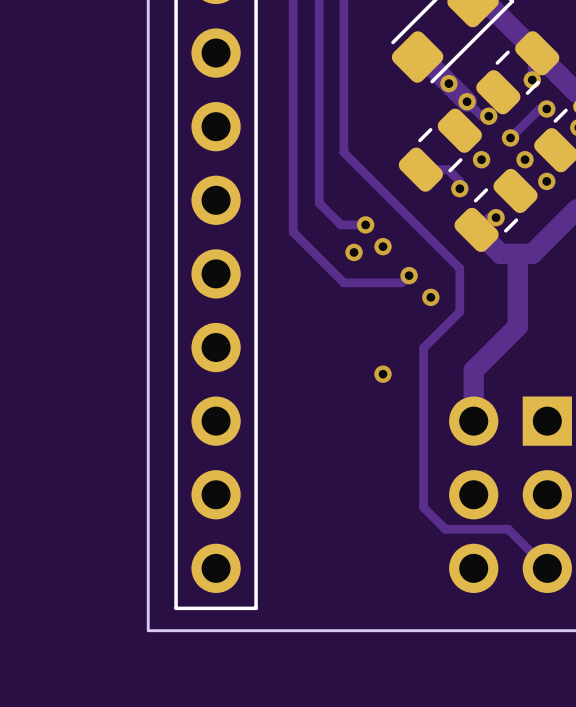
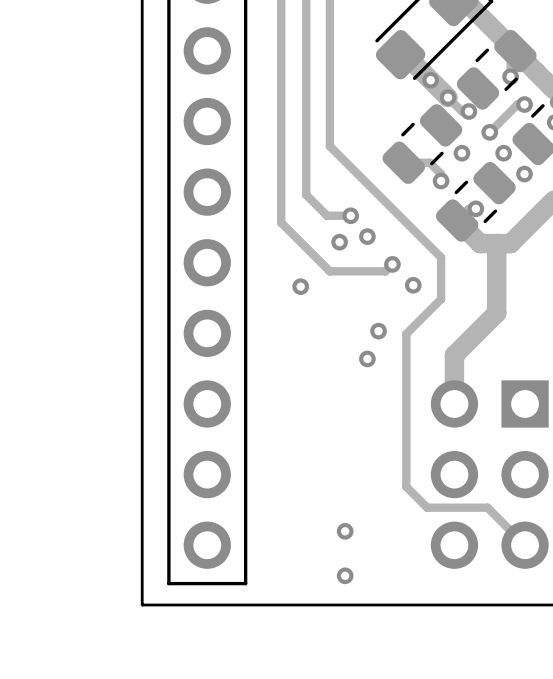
via: none -> (300, 286)
via: none -> (378, 331)
via: none -> (345, 531)
via: none -> (345, 575)

